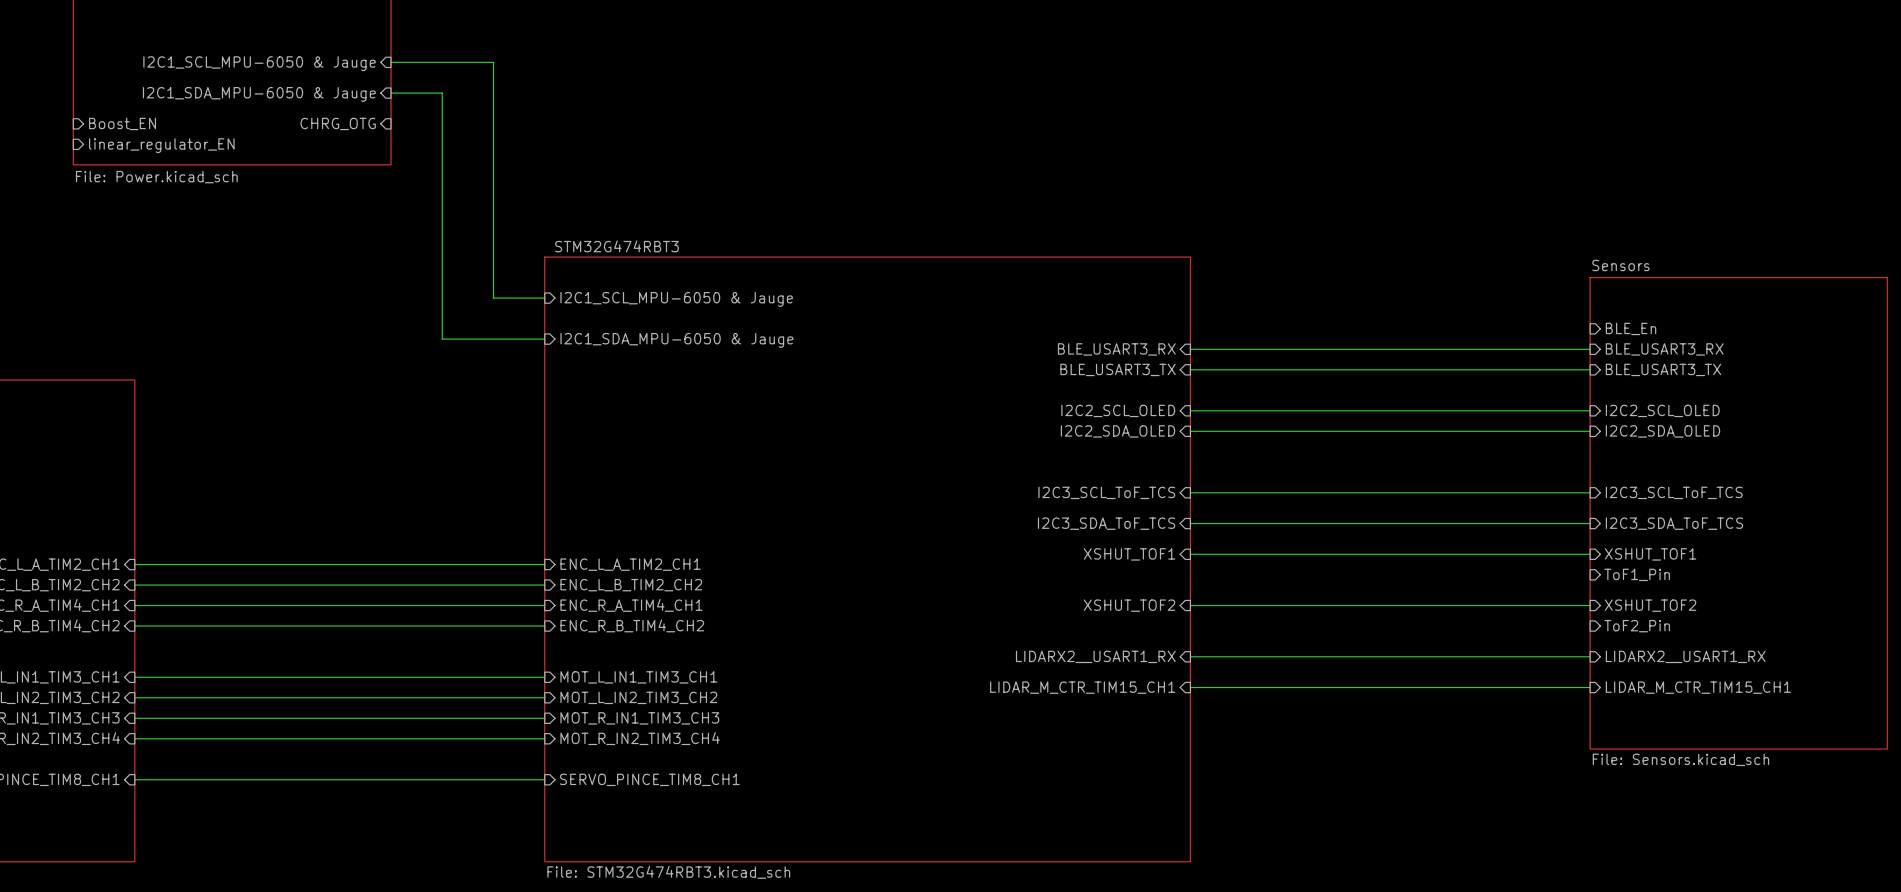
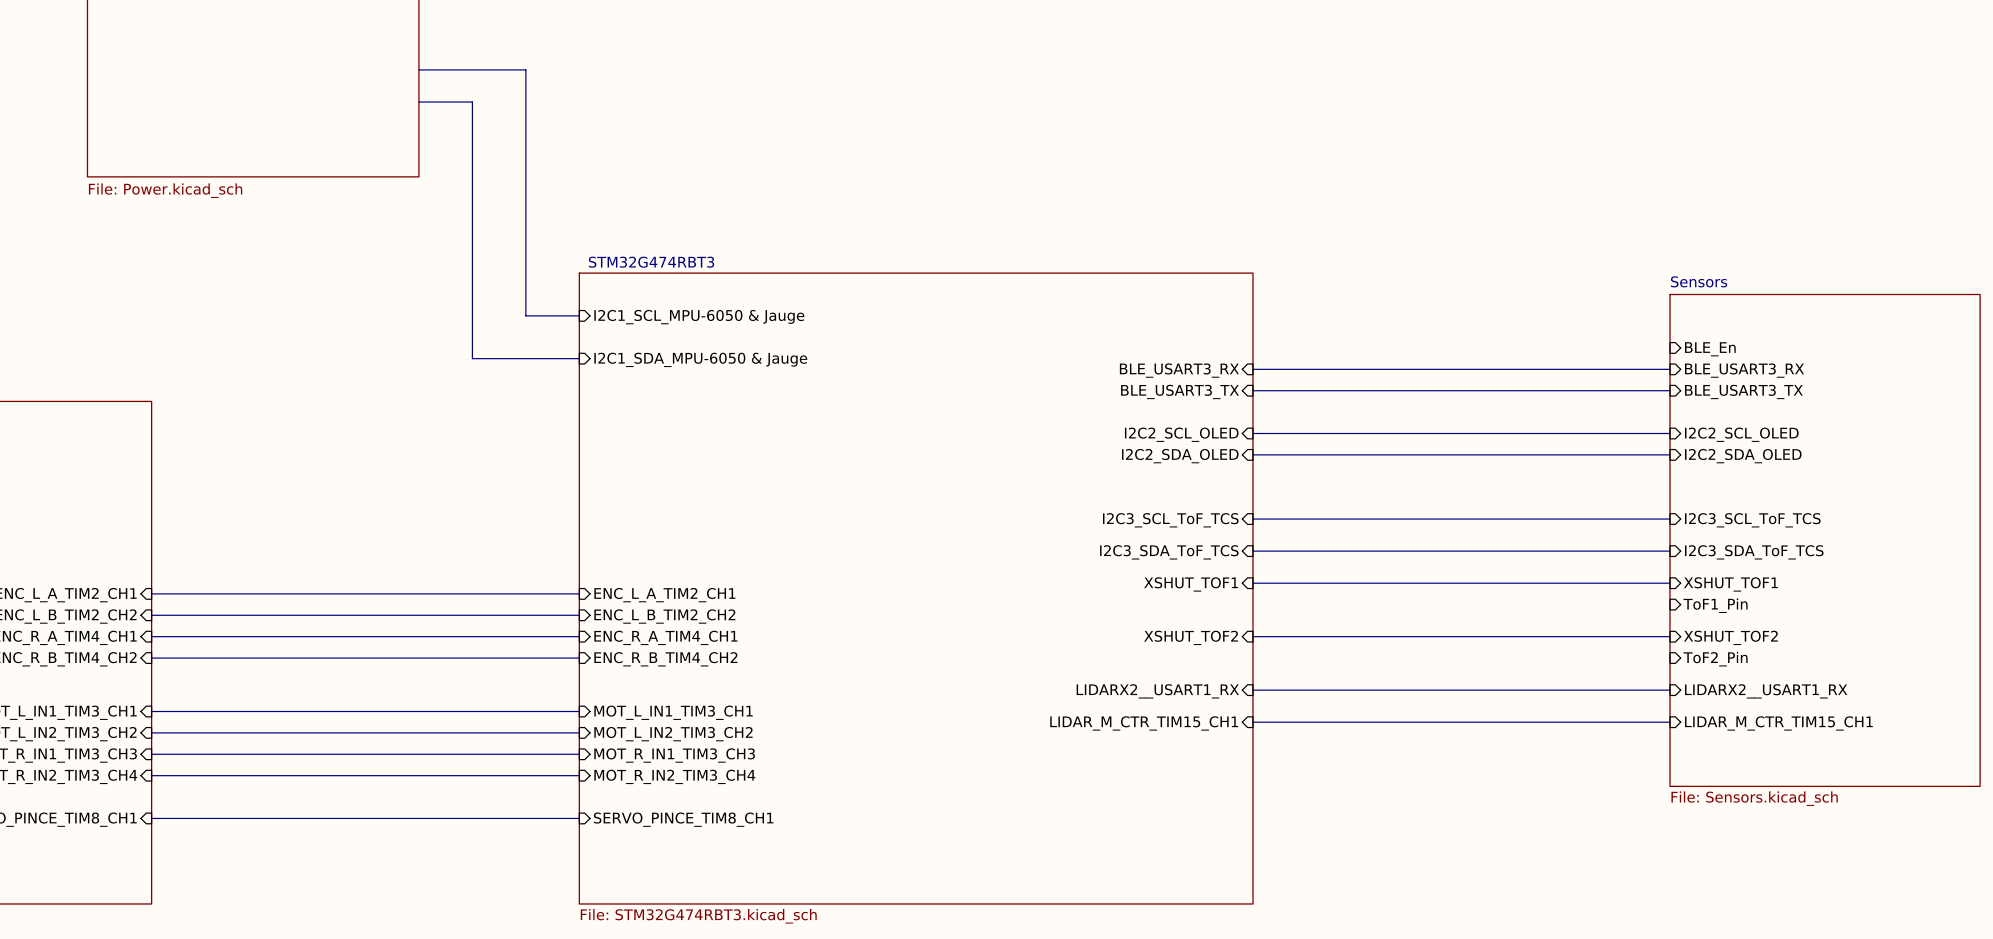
sheet pin: I2C1_SCL_MPU-6050 & Jauge (259, 63) -> none
sheet pin: I2C1_SDA_MPU-6050 & Jauge (259, 94) -> none
sheet pin: Boost_EN (122, 123) -> none
sheet pin: CHRG_OTG (338, 123) -> none
sheet pin: linear_regulator_EN (161, 145) -> none

